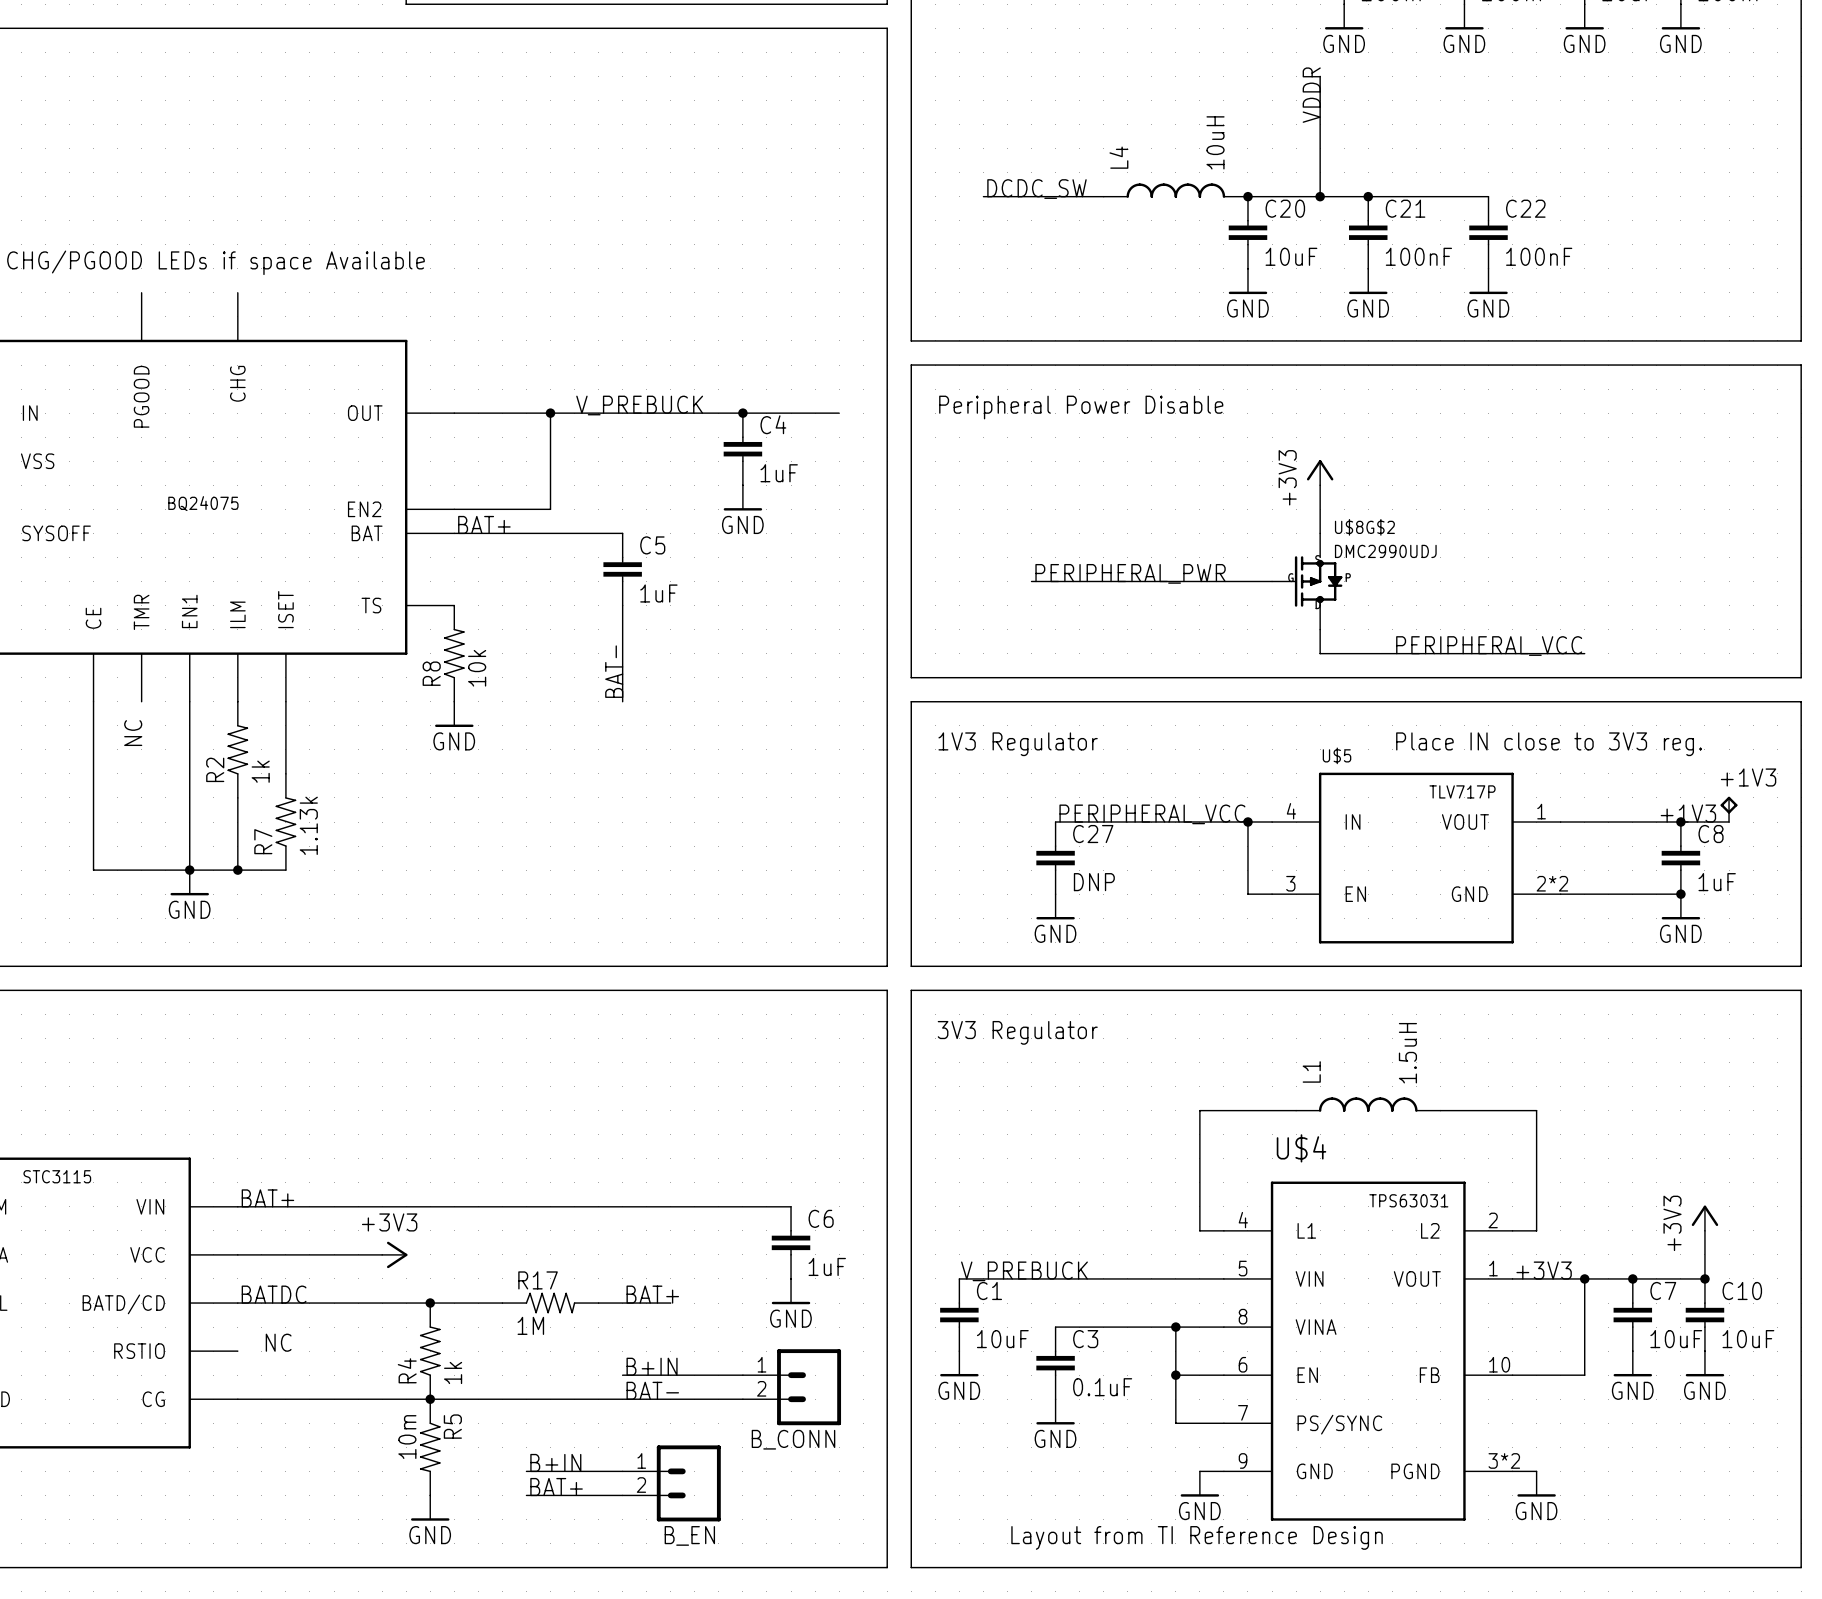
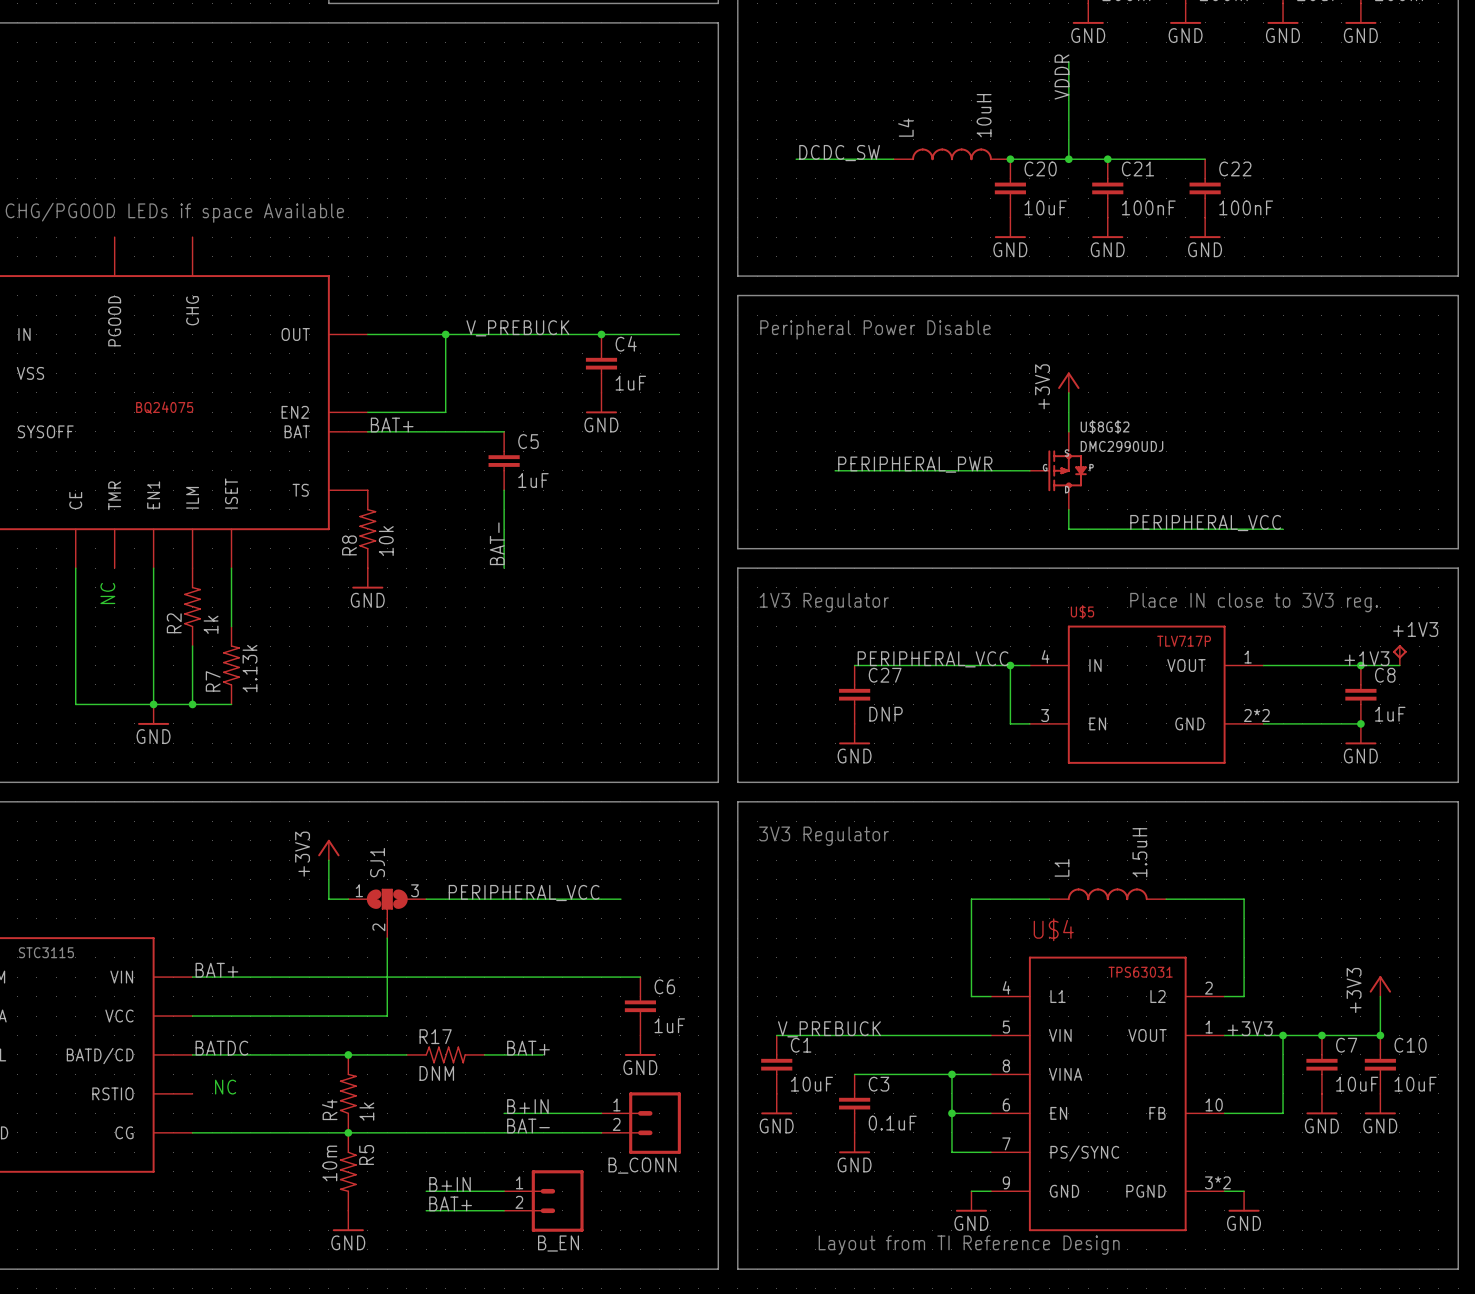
wire: none -> (328, 860) (328, 899) (348, 899)
label: none -> PERIPHERAL_VCC (524, 893)
wire: none -> (426, 899) (620, 899)
SJ1: none -> (387, 913)
wire: none -> (387, 938) (387, 1016) (309, 1016)
power symbol position: +3V3 (394, 1254) -> +3V3 (328, 850)
power symbol rotation: 0° (397, 1254) -> 90° counterclockwise (328, 848)
R17 value: 1M (530, 1325) -> DNM (436, 1073)

